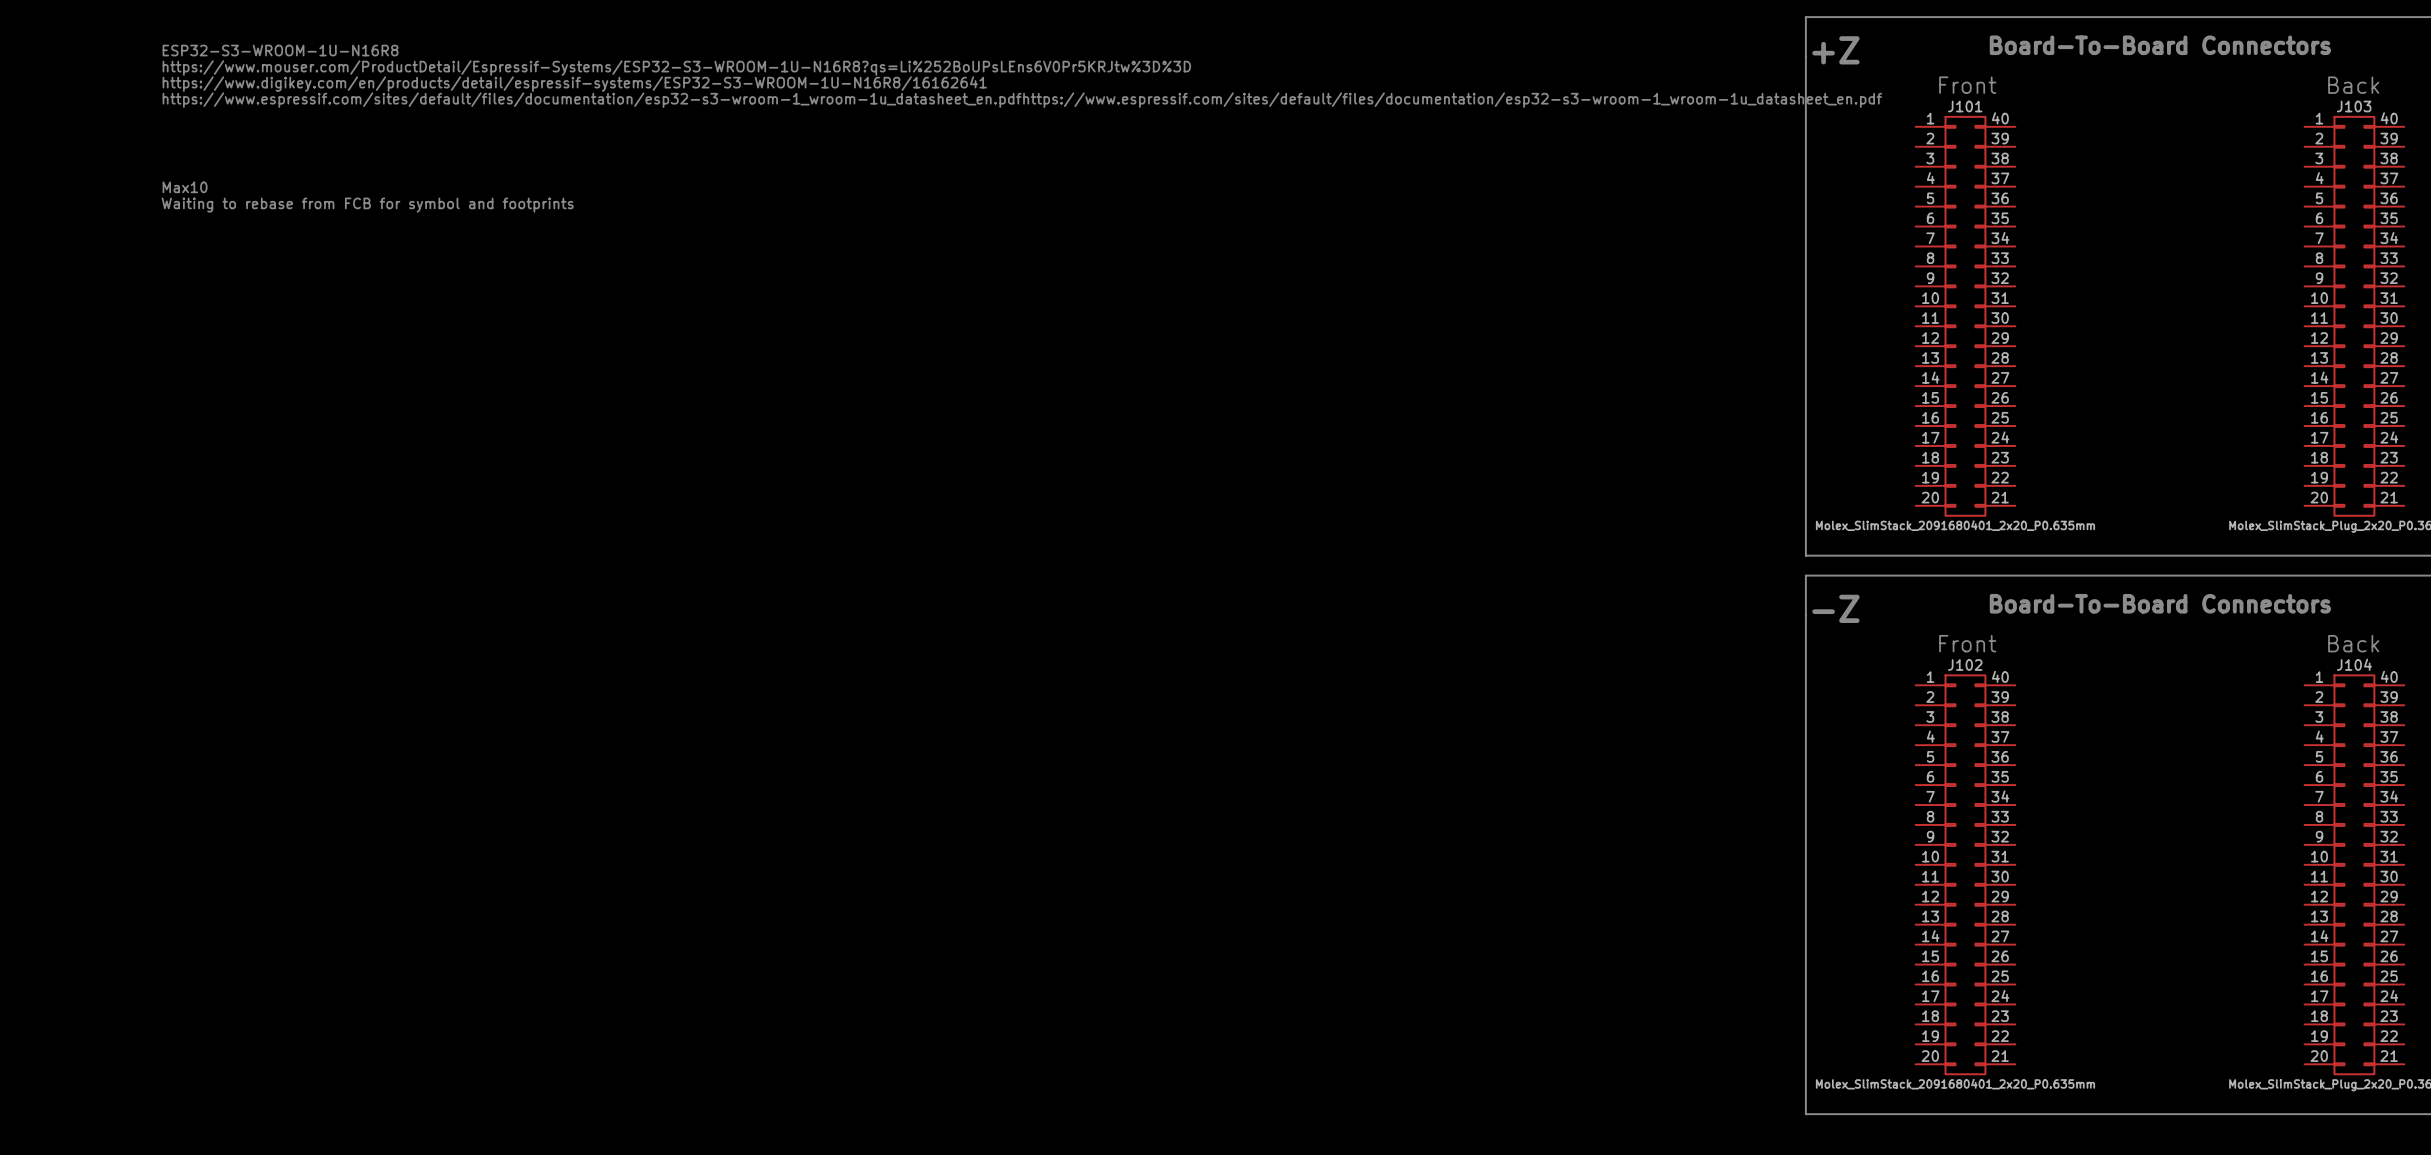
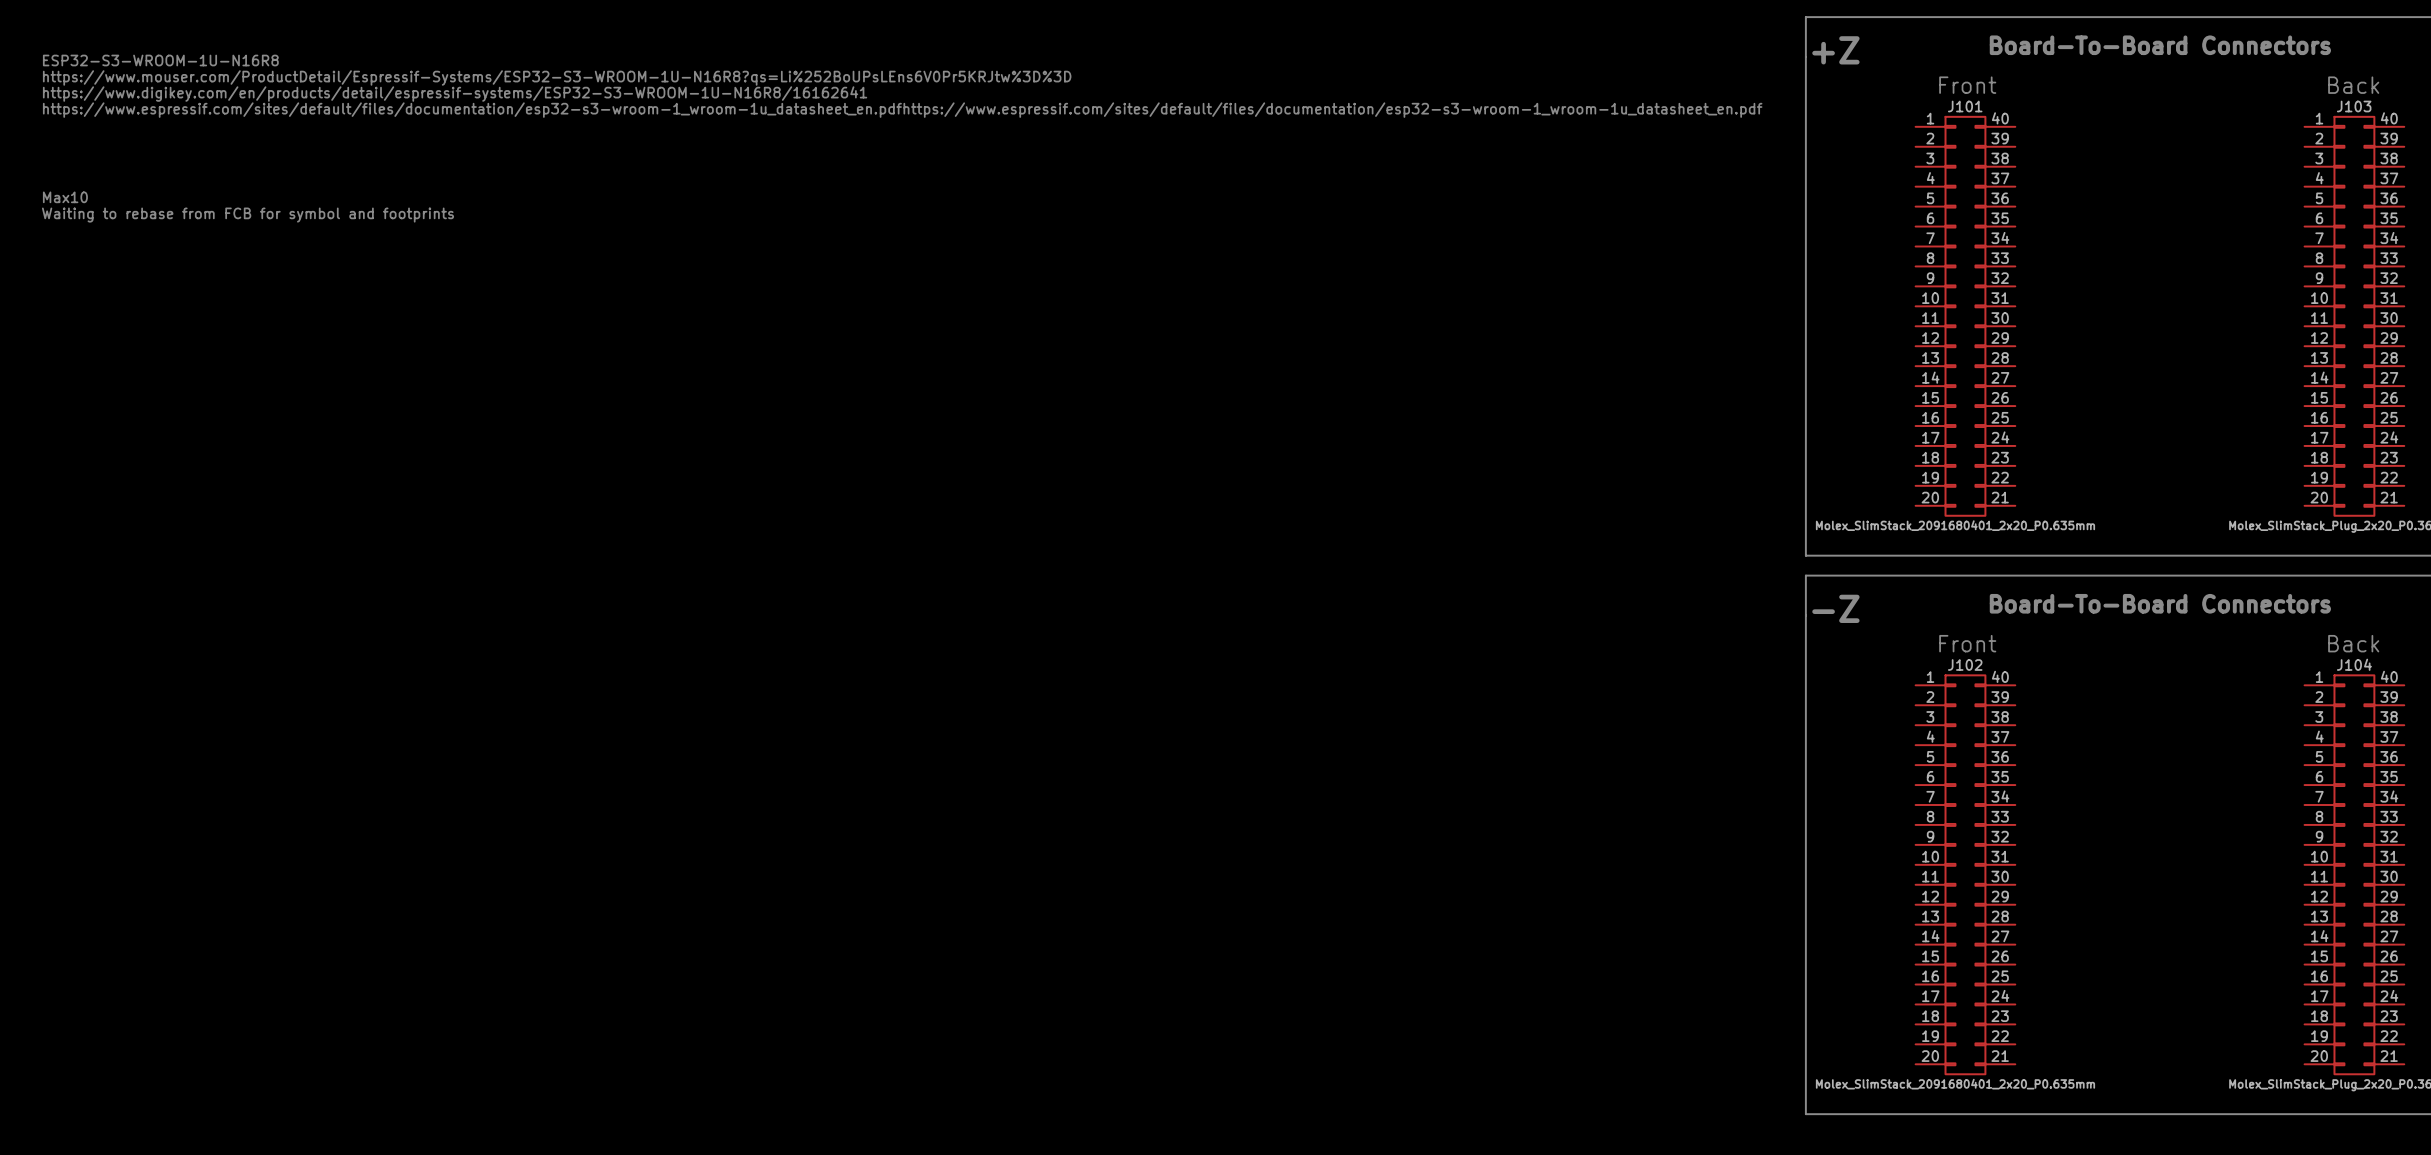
text position: ESP32-S3-WROOM-1U-N16R8 (280, 50) -> ESP32-S3-WROOM-1U-N16R8 (160, 60)
text position: https://www.mouser.com/ProductDetail/Espressif-Systems/ESP32-S3-WROOM-1U-N16R8?qs=Li%252BoUPsLEns6V0Pr5KRJtw%3D%3D (676, 68) -> https://www.mouser.com/ProductDetail/Espressif-Systems/ESP32-S3-WROOM-1U-N16R8?qs=Li%252BoUPsLEns6V0Pr5KRJtw%3D%3D (557, 77)
text position: https://www.digikey.com/en/products/detail/espressif-systems/ESP32-S3-WROOM-1U-N16R8/16162641 (574, 84) -> https://www.digikey.com/en/products/detail/espressif-systems/ESP32-S3-WROOM-1U-N16R8/16162641 (455, 94)
text position: https://www.espressif.com/sites/default/files/documentation/esp32-s3-wroom-1_wroom-1u_datasheet_en.pdfhttps://www.espressif.com/sites/default/files/documentation/esp32-s3-wroom-1_wroom-1u_datasheet_en.pdf (1022, 100) -> https://www.espressif.com/sites/default/files/documentation/esp32-s3-wroom-1_wroom-1u_datasheet_en.pdfhttps://www.espressif.com/sites/default/files/documentation/esp32-s3-wroom-1_wroom-1u_datasheet_en.pdf (902, 110)
text position: Max10 (185, 187) -> Max10 (65, 197)
text position: Waiting to rebase from FCB for symbol and footprints (367, 205) -> Waiting to rebase from FCB for symbol and footprints (248, 215)

